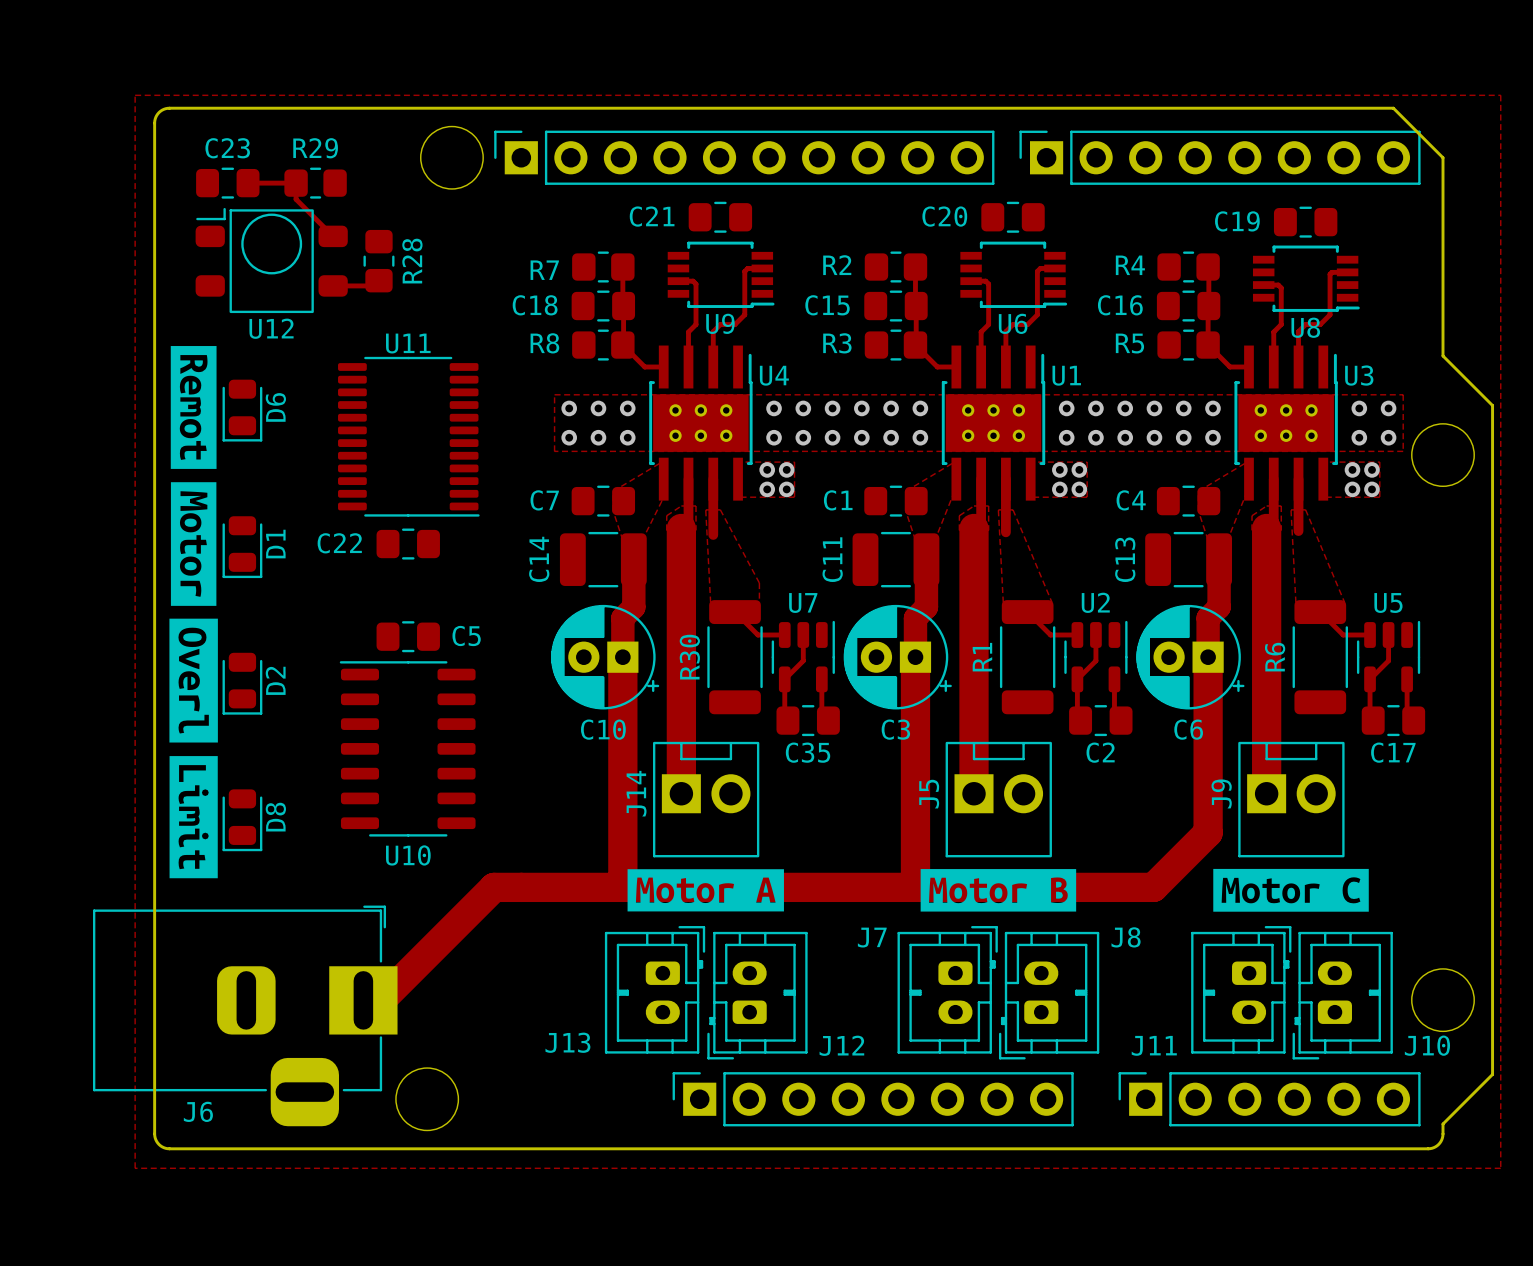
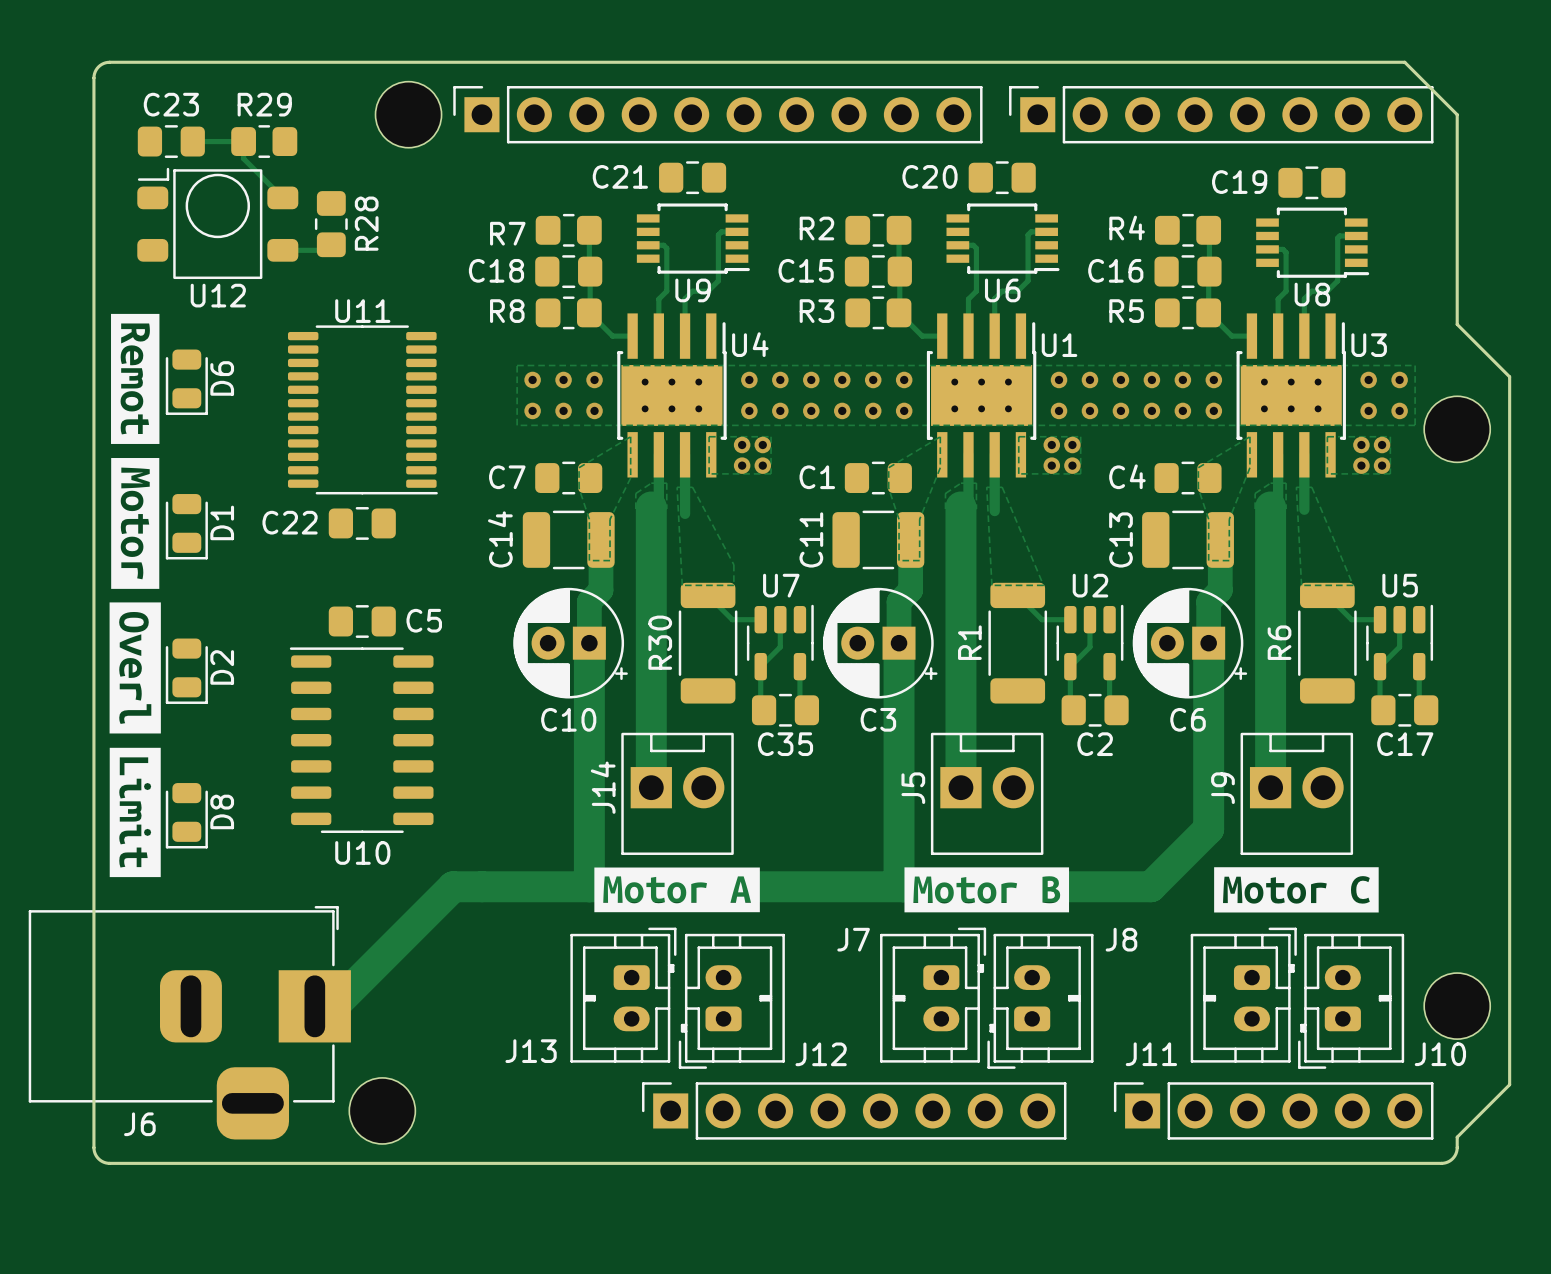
zone outline: (135, 95) (135, 1168) (1500, 1168) (1500, 95) (135, 95) -> none

